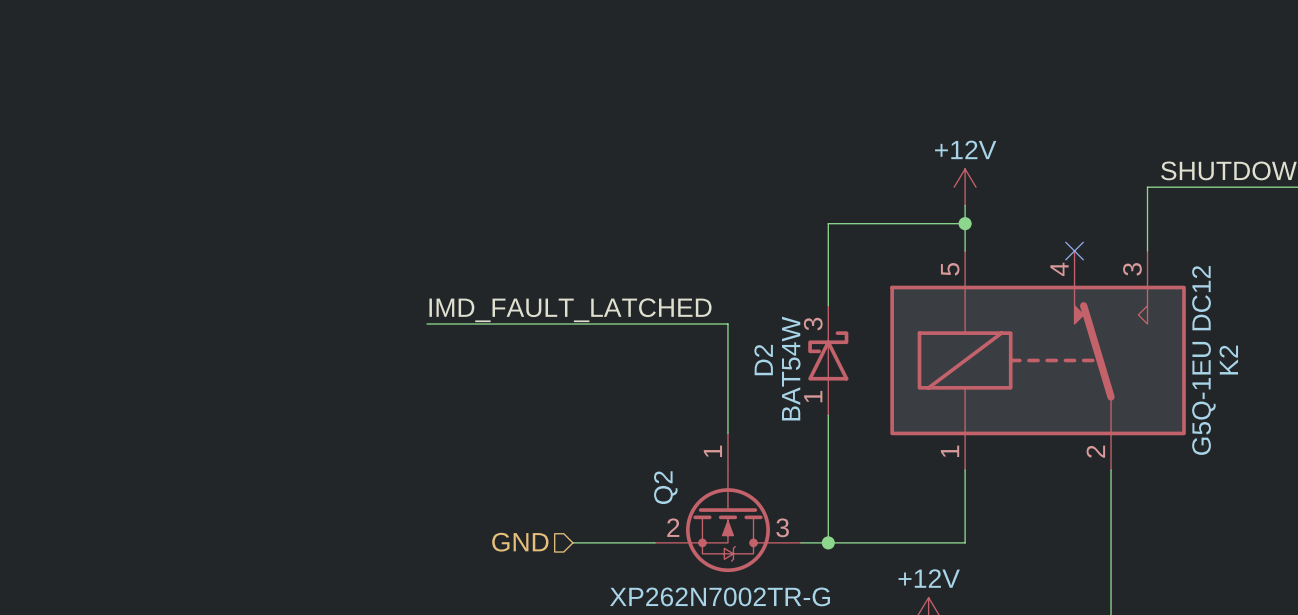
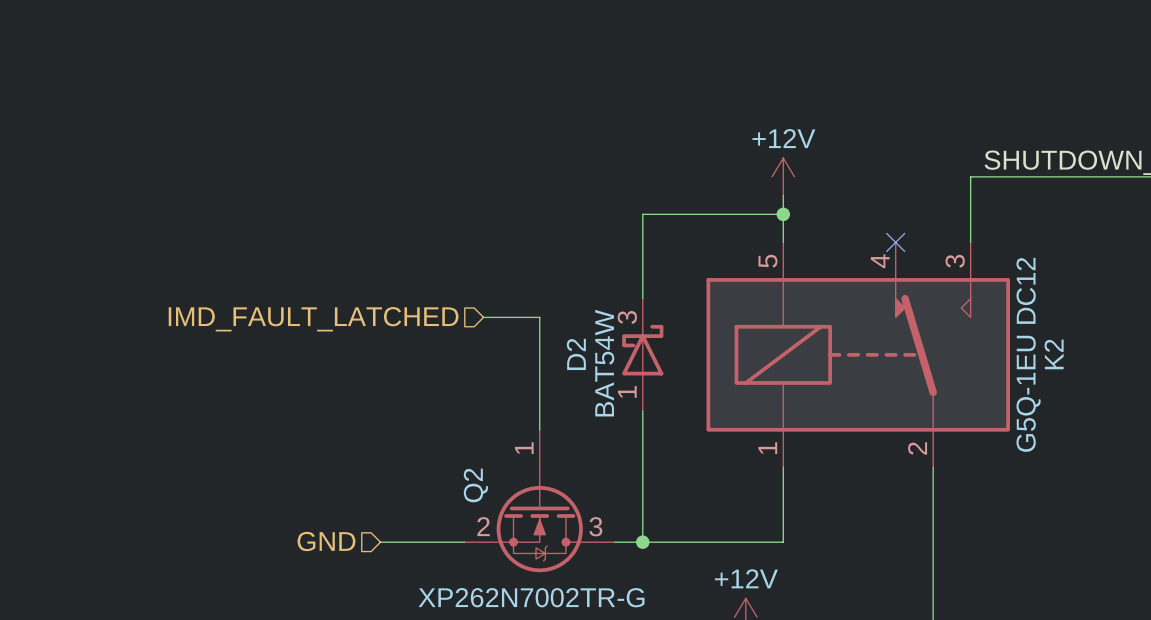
label: IMD_FAULT_LATCHED (570, 310) -> none
wire: (427, 324) (673, 324) -> none
hierarchical label: none -> IMD_FAULT_LATCHED (313, 319)

